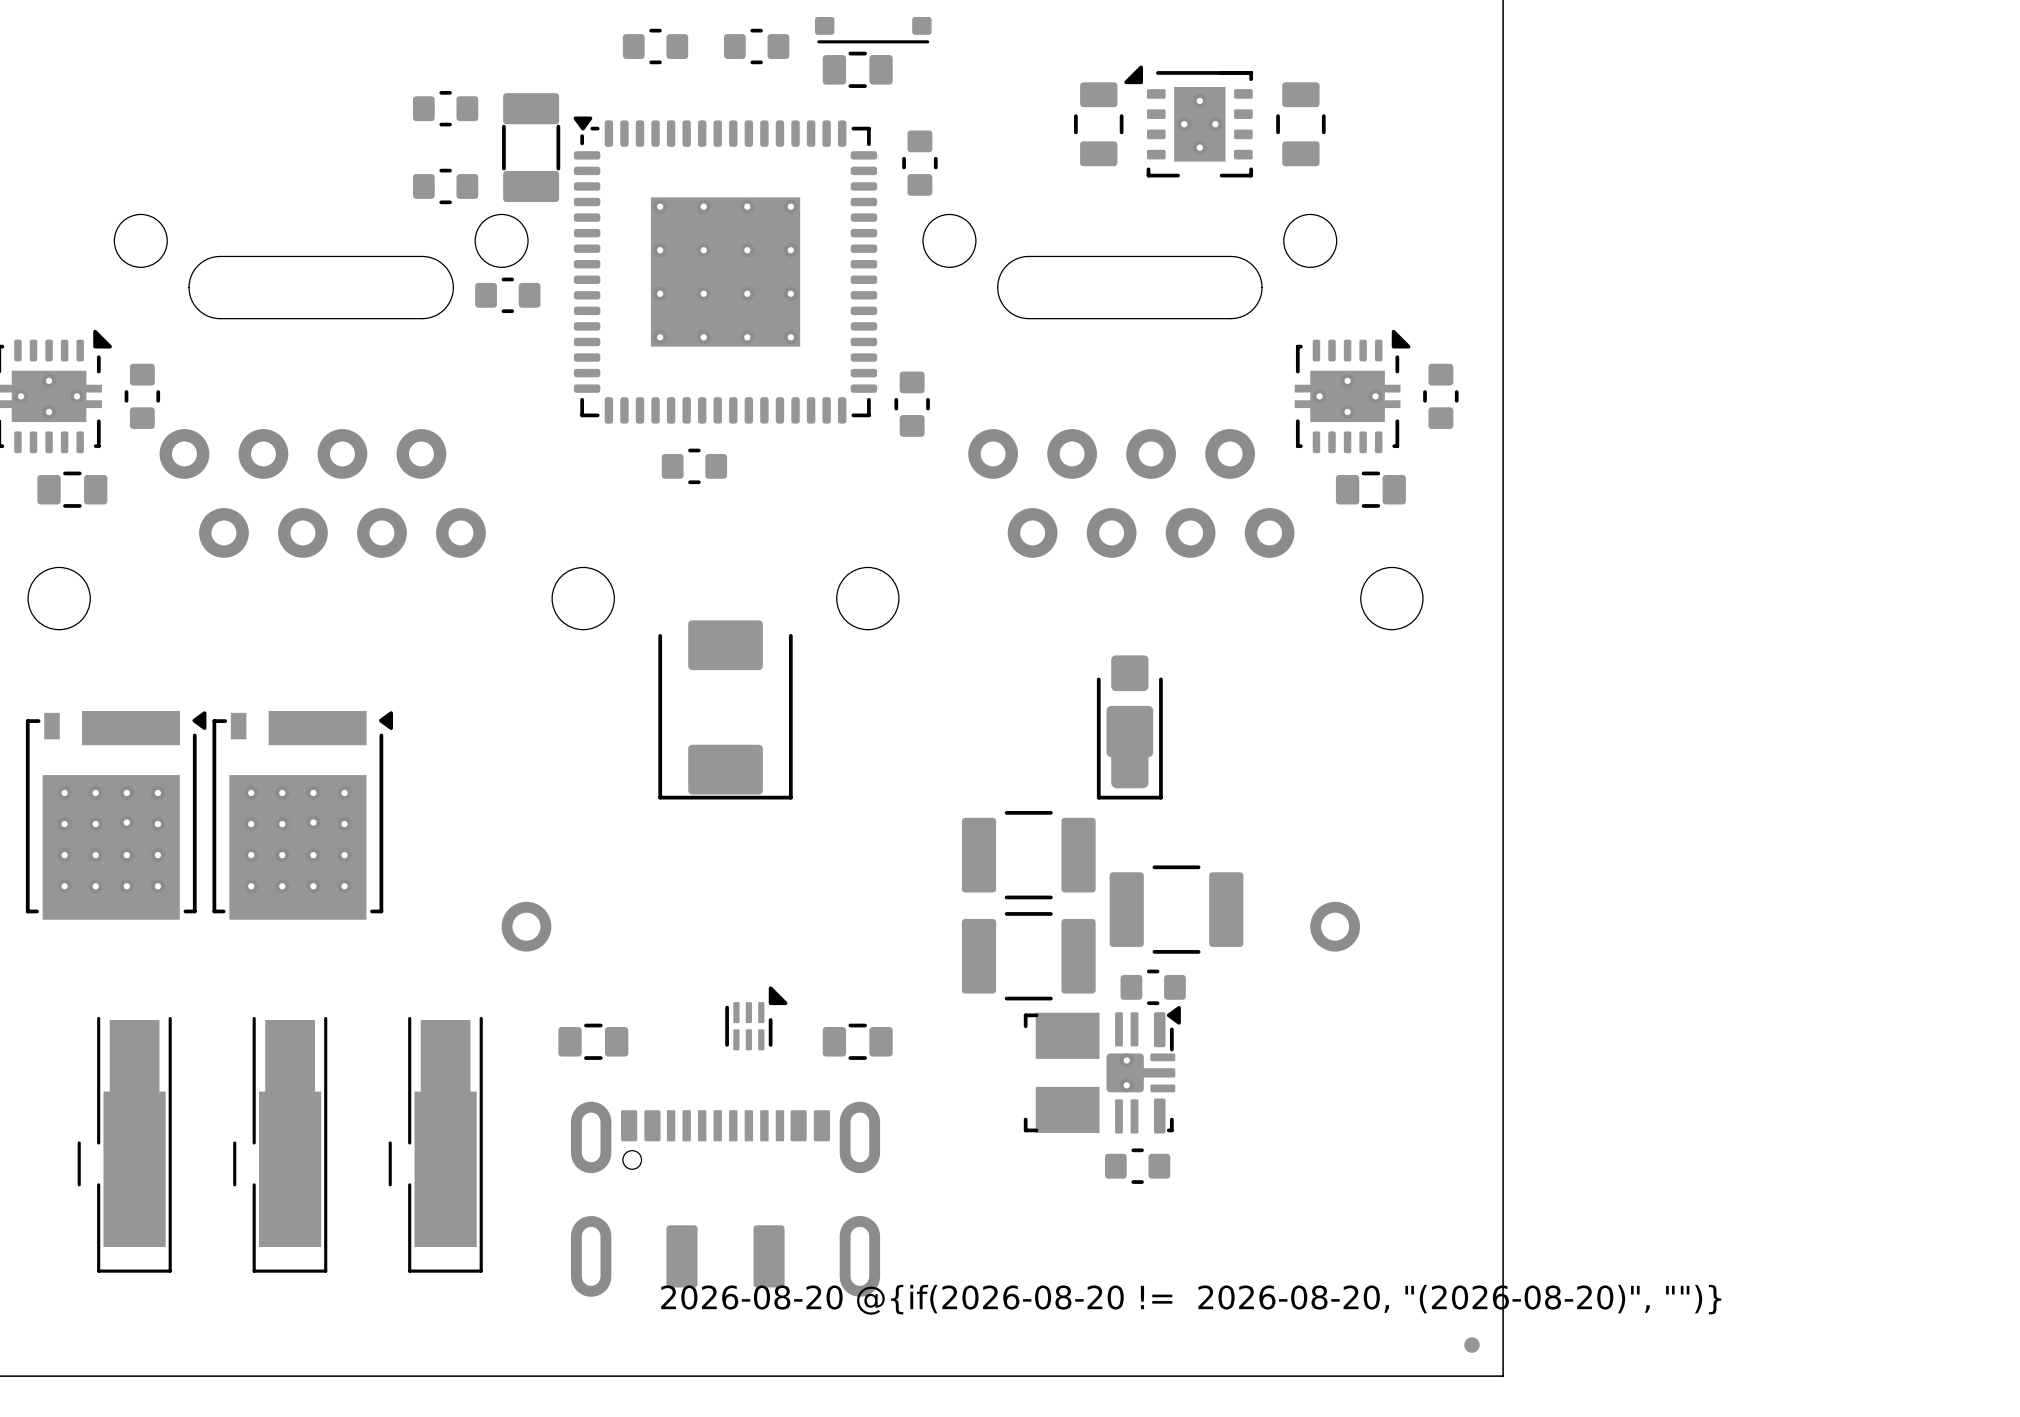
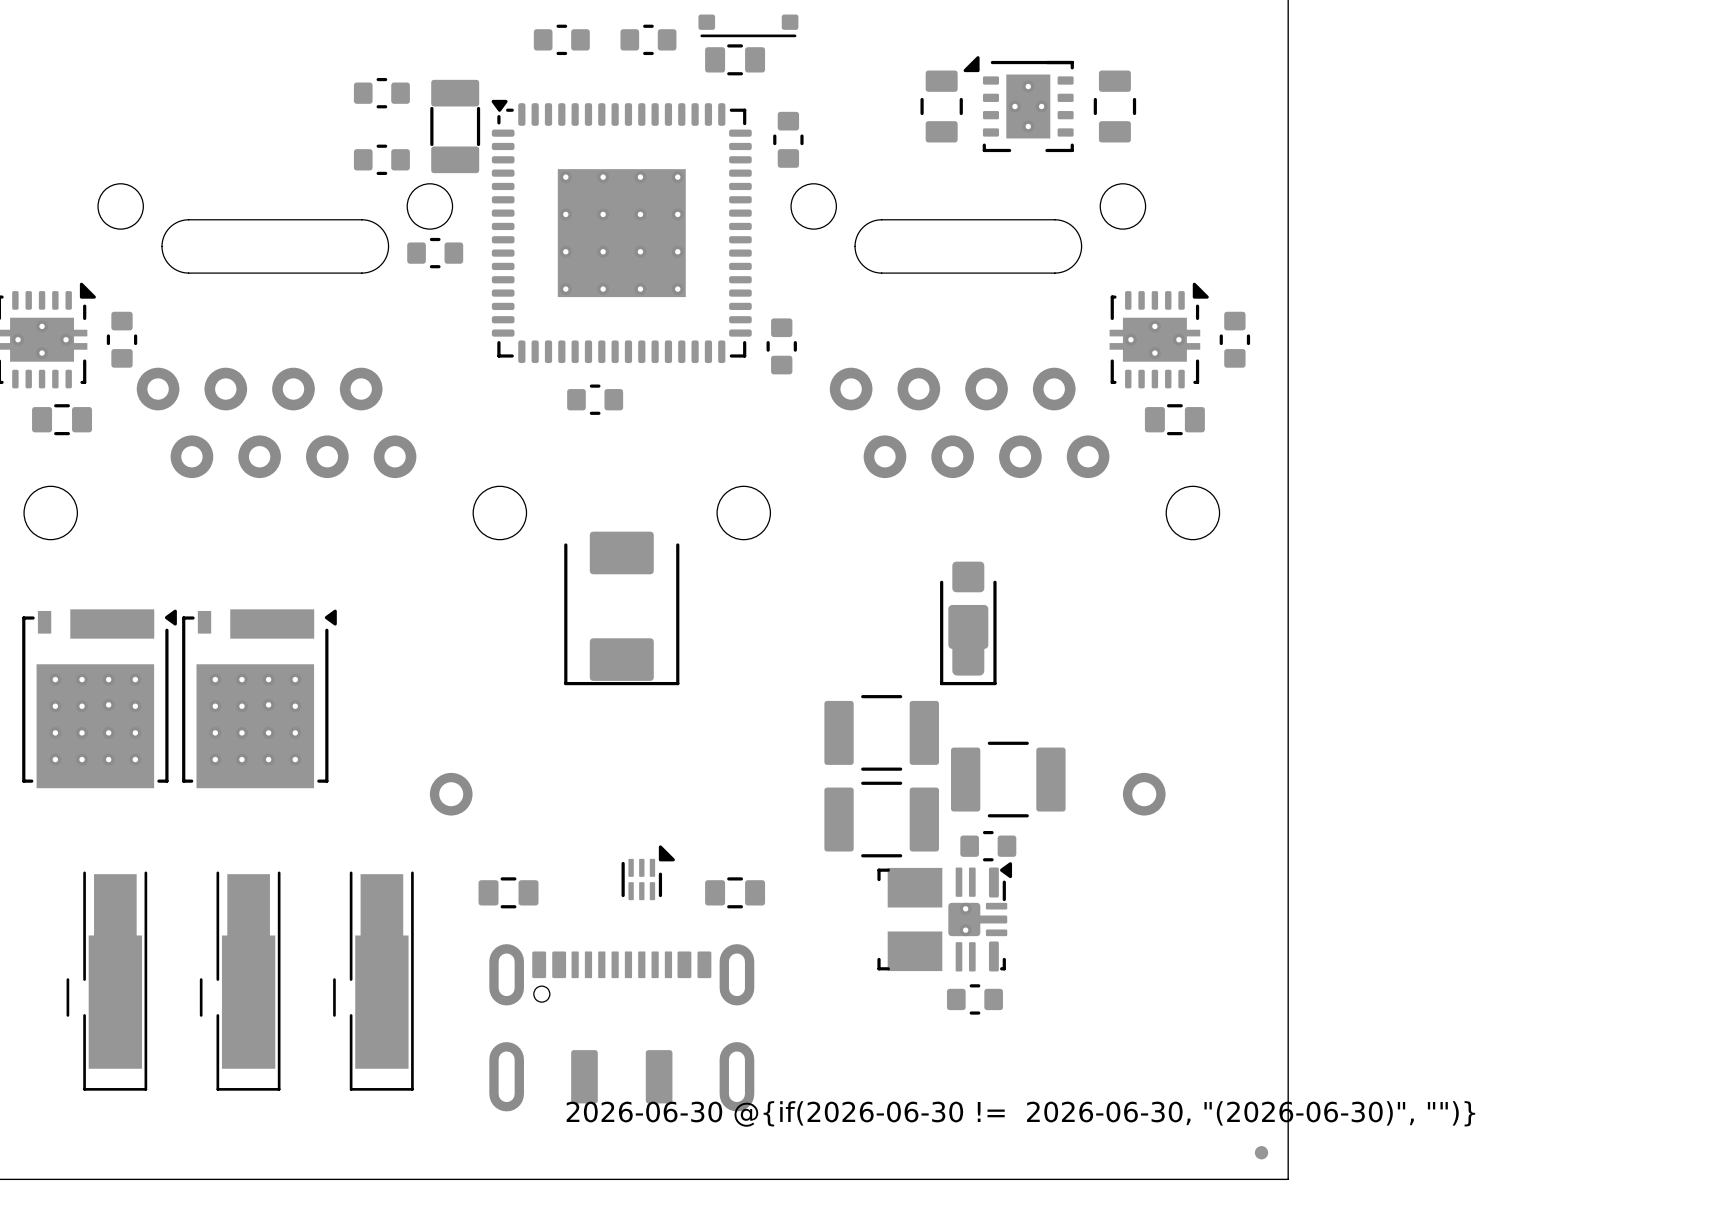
drawing shape: [661, 1284, 1722, 1315] -> [566, 1101, 1476, 1127]

